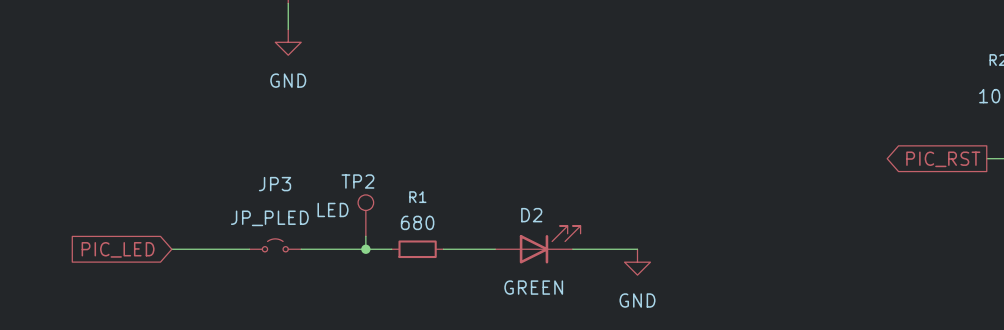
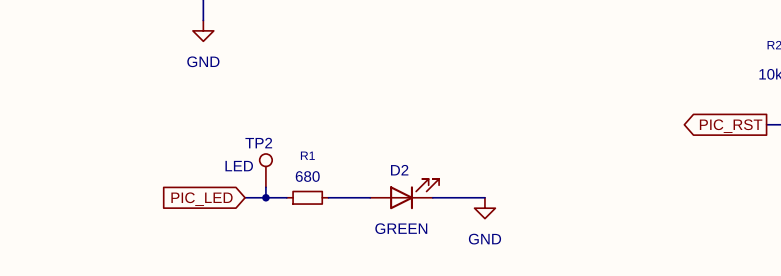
JP3: JP_PLED (275, 245) -> none
global label position: PIC_LED (118, 249) -> PIC_LED (202, 199)
wire: (171, 249) (249, 249) -> none
wire: (301, 249) (339, 249) -> none

